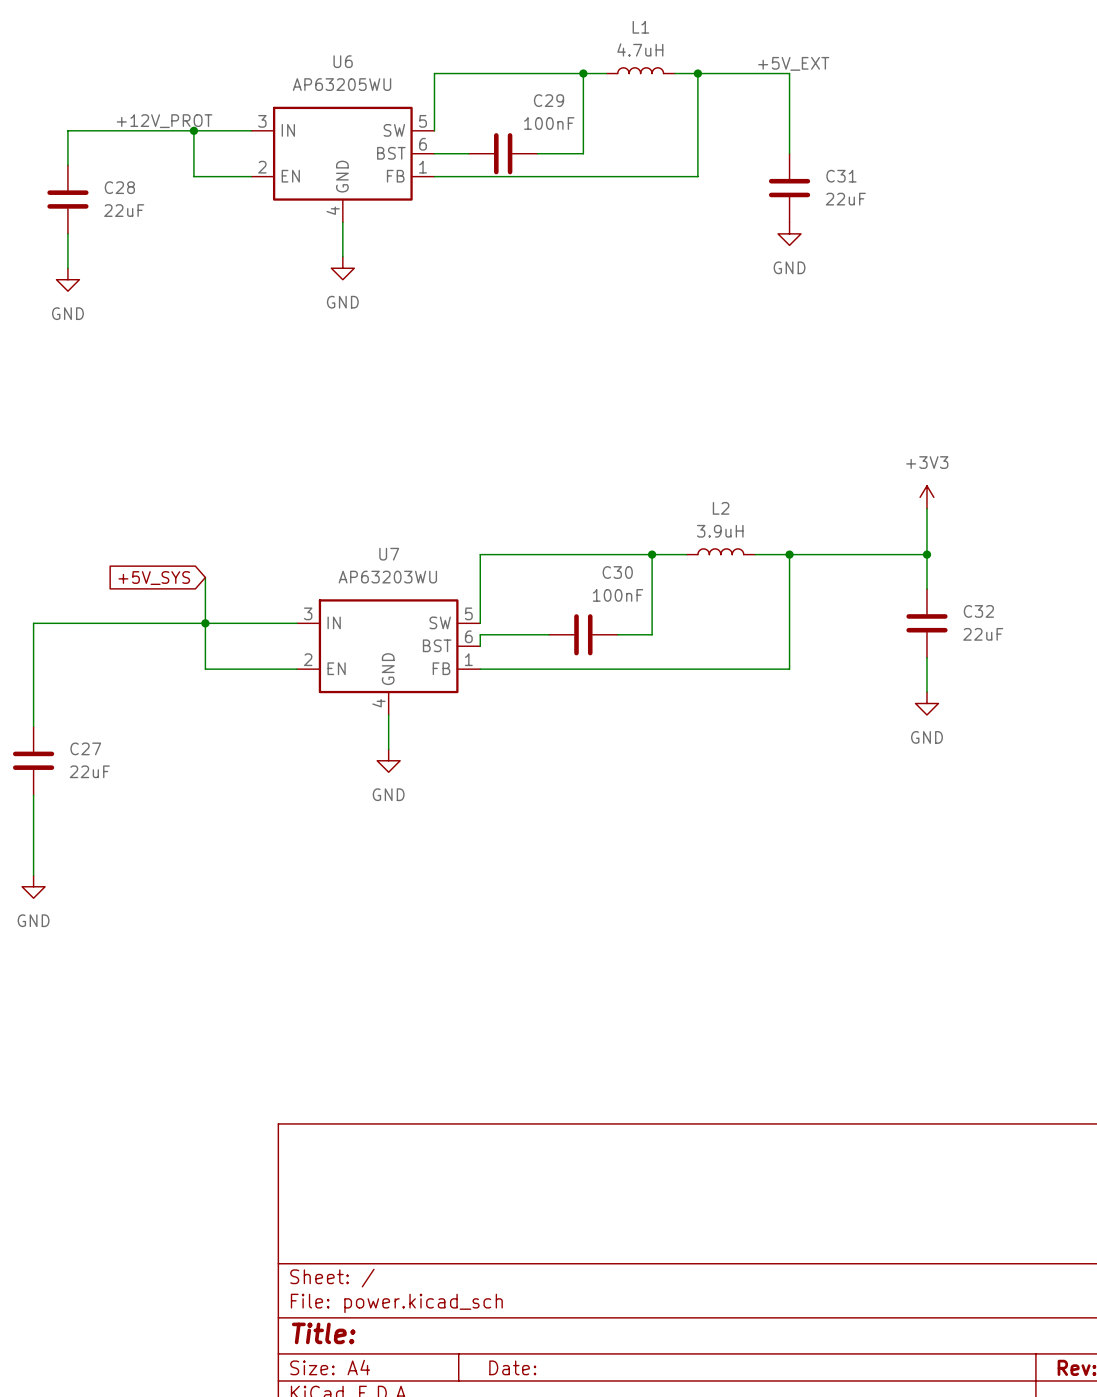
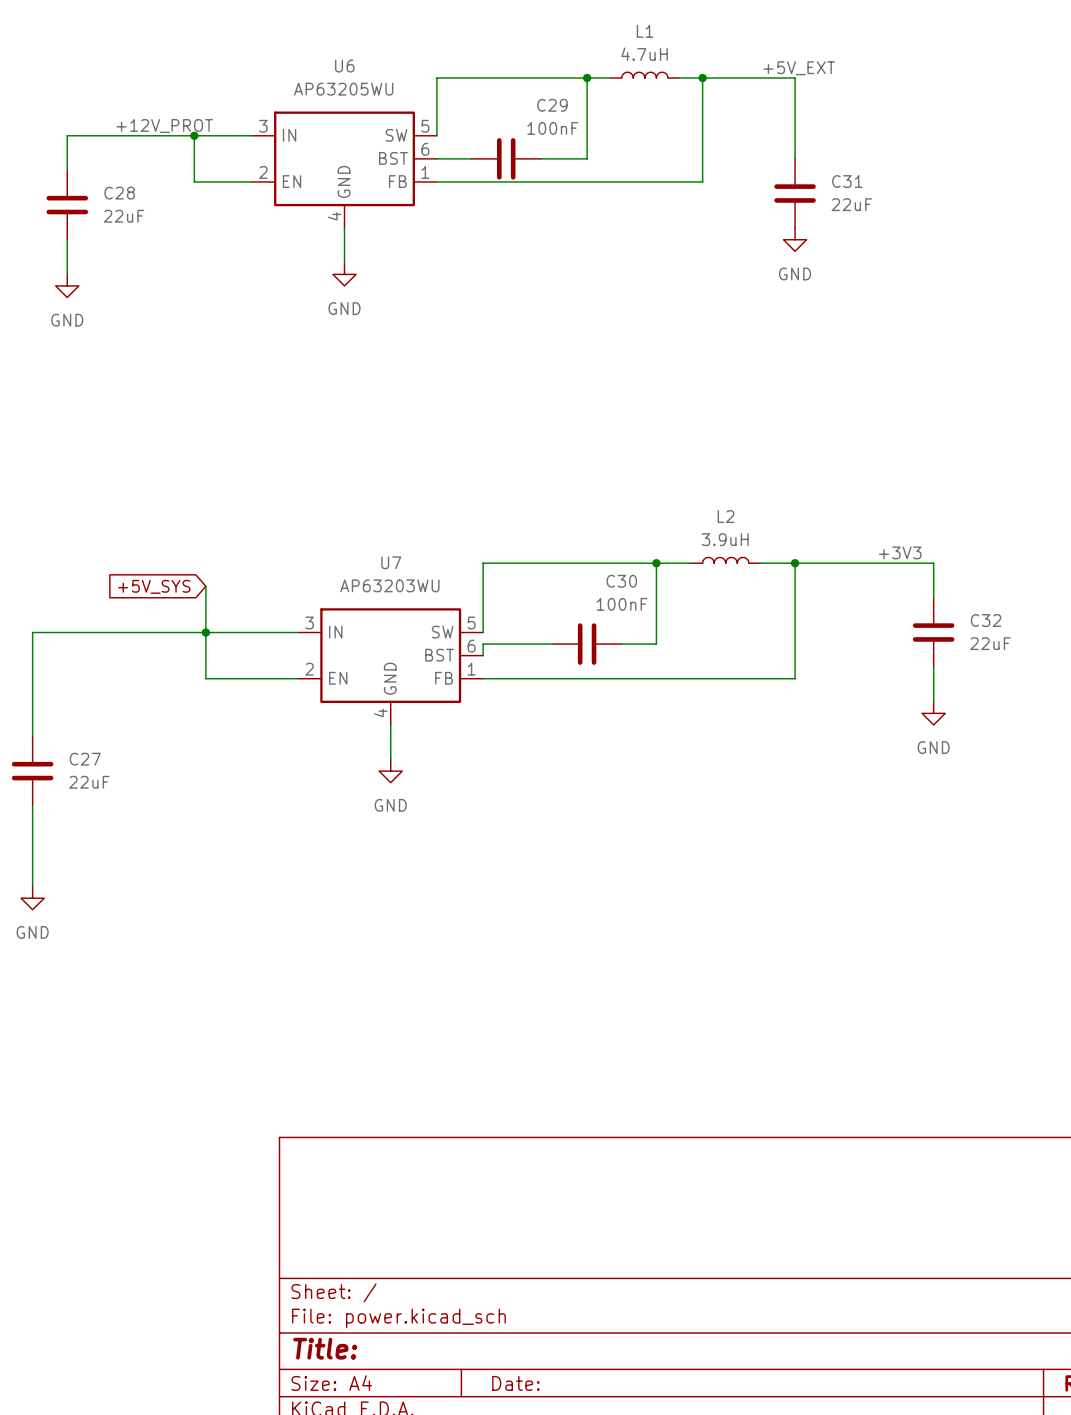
power symbol: +3V3 (926, 497) -> none
wire: (926, 508) (926, 554) -> none
label: none -> +3V3 (900, 552)
junction: (926, 554) -> none

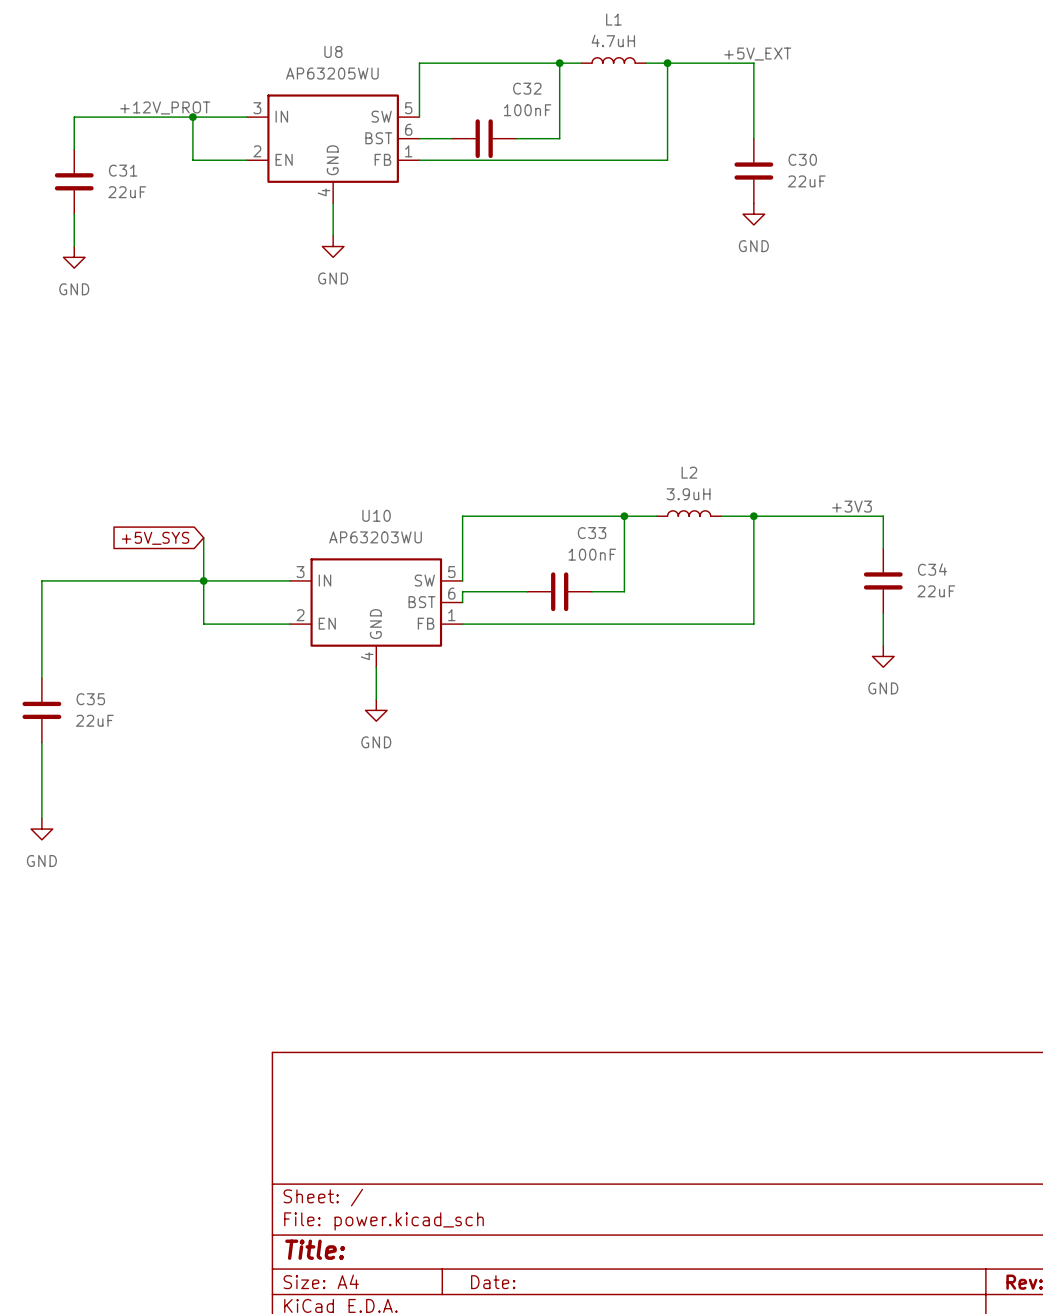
U6 name: U6 (344, 66) -> U8 (333, 51)
C29 name: C29 (552, 105) -> C32 (527, 88)
C31 name: C31 (847, 181) -> C30 (802, 159)
C28 name: C28 (119, 193) -> C31 (123, 170)
U7 name: U7 (391, 562) -> U10 (376, 515)
C30 name: C30 (621, 581) -> C33 (592, 533)
C32 name: C32 (986, 620) -> C34 (932, 569)
C27 name: C27 (85, 759) -> C35 (90, 699)

